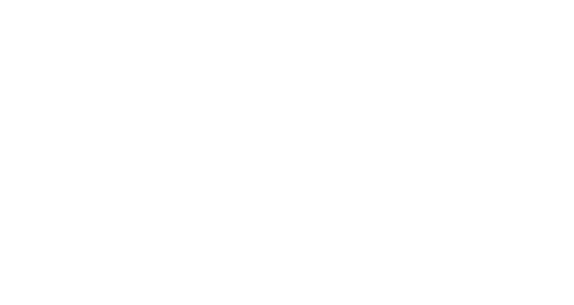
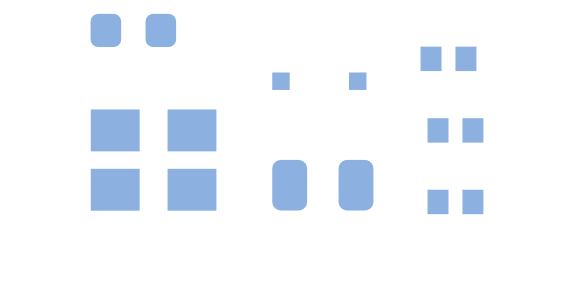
part: none -> (133, 30)
part: none -> (448, 58)
part: none -> (319, 81)
part: none -> (455, 130)
part: none -> (153, 160)
part: none -> (322, 185)
part: none -> (455, 201)

